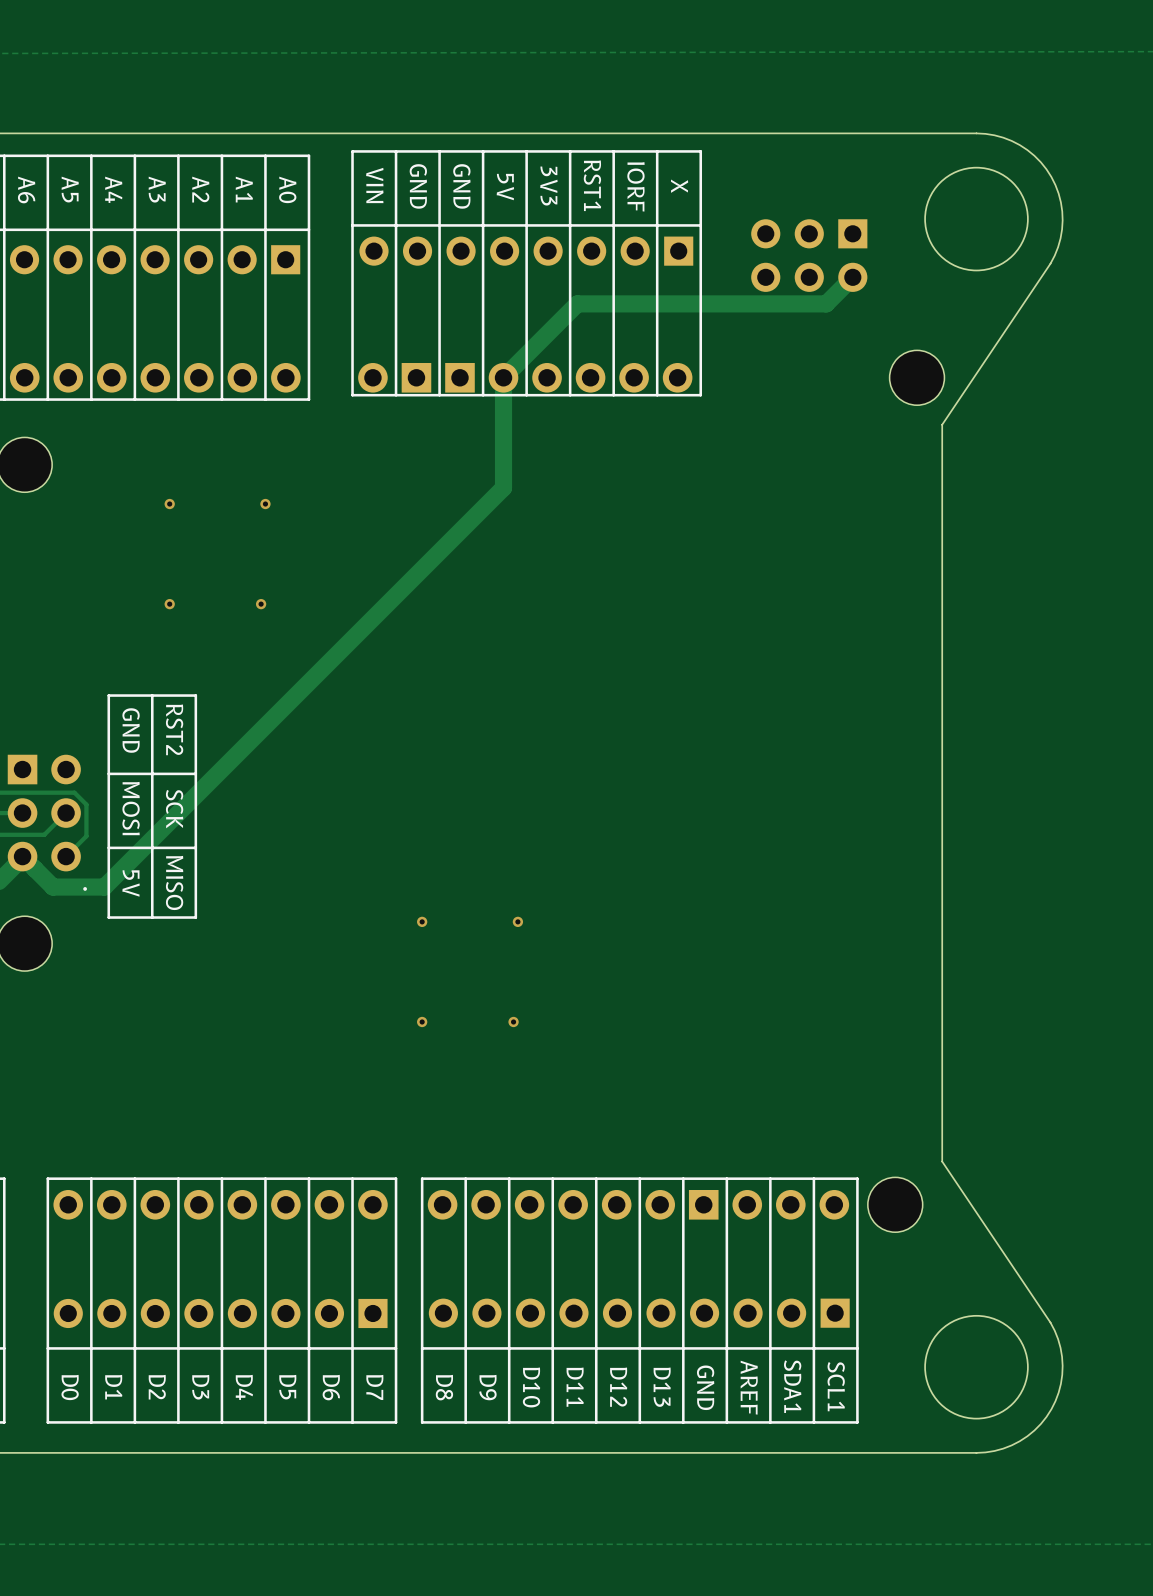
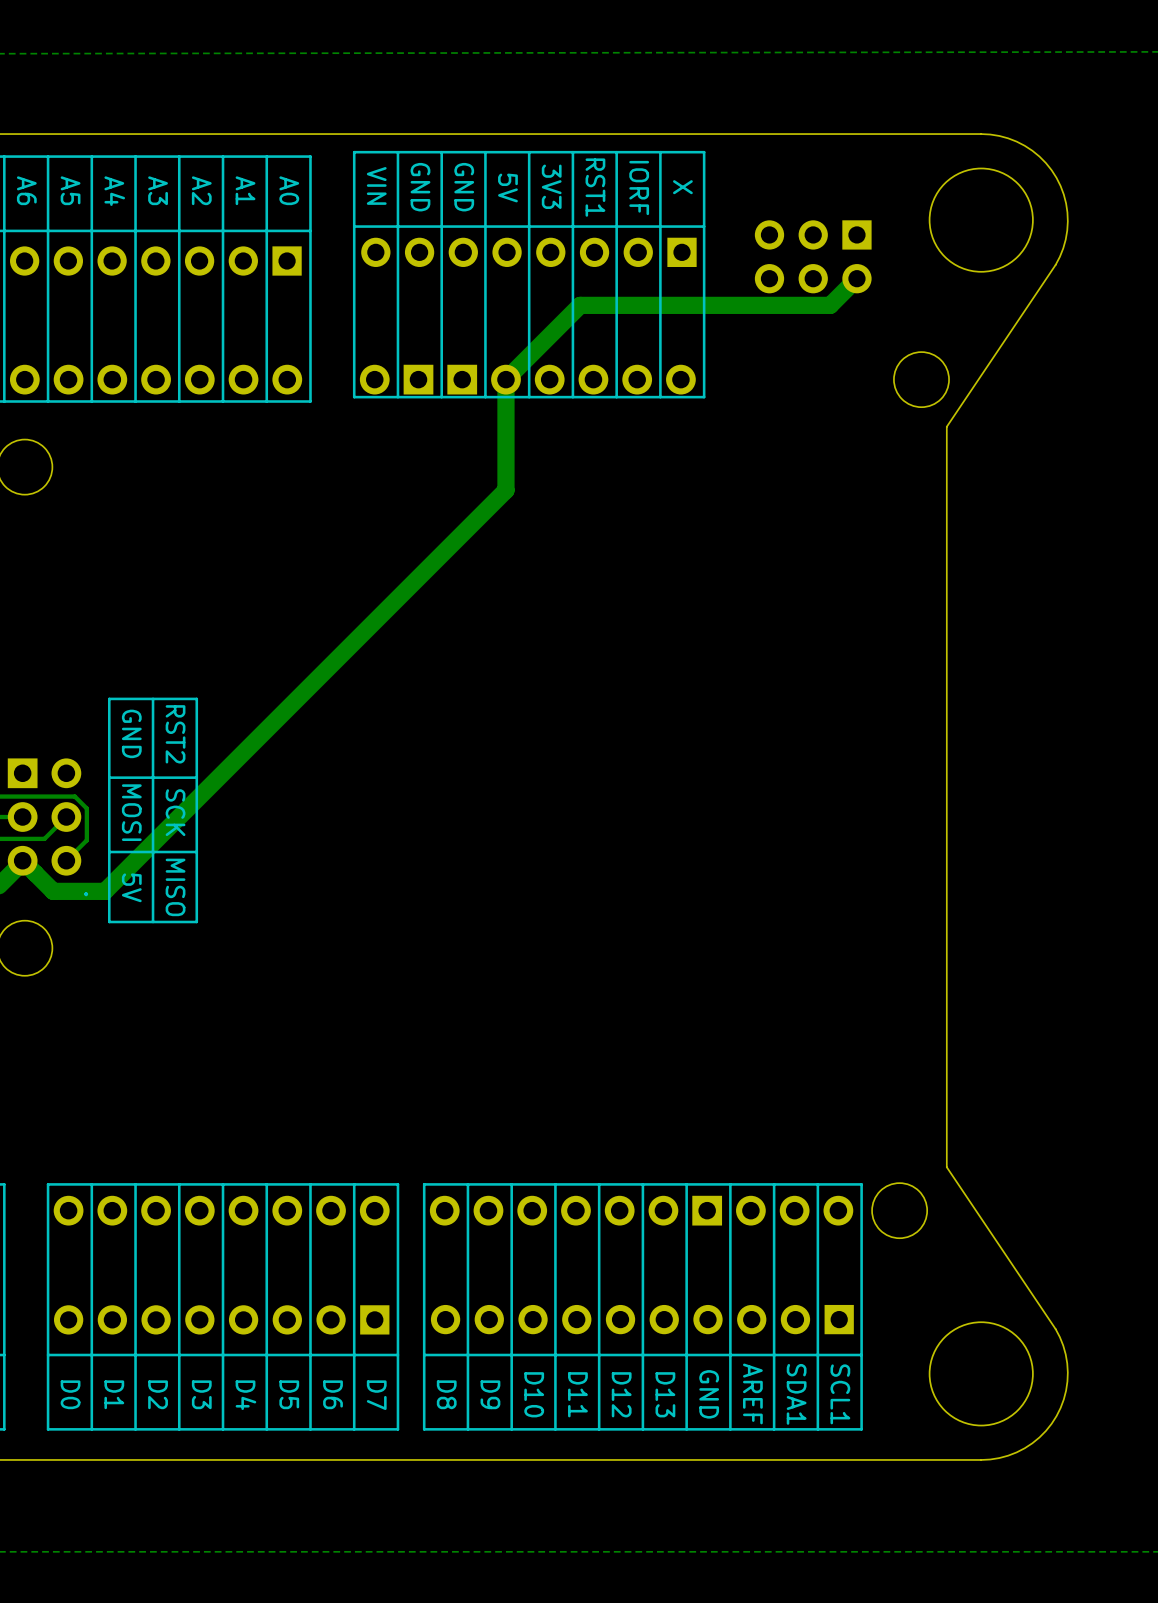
via: (169, 504) -> none
via: (265, 504) -> none
via: (169, 604) -> none
via: (261, 604) -> none
via: (422, 921) -> none
via: (517, 921) -> none
via: (422, 1021) -> none
via: (513, 1021) -> none

